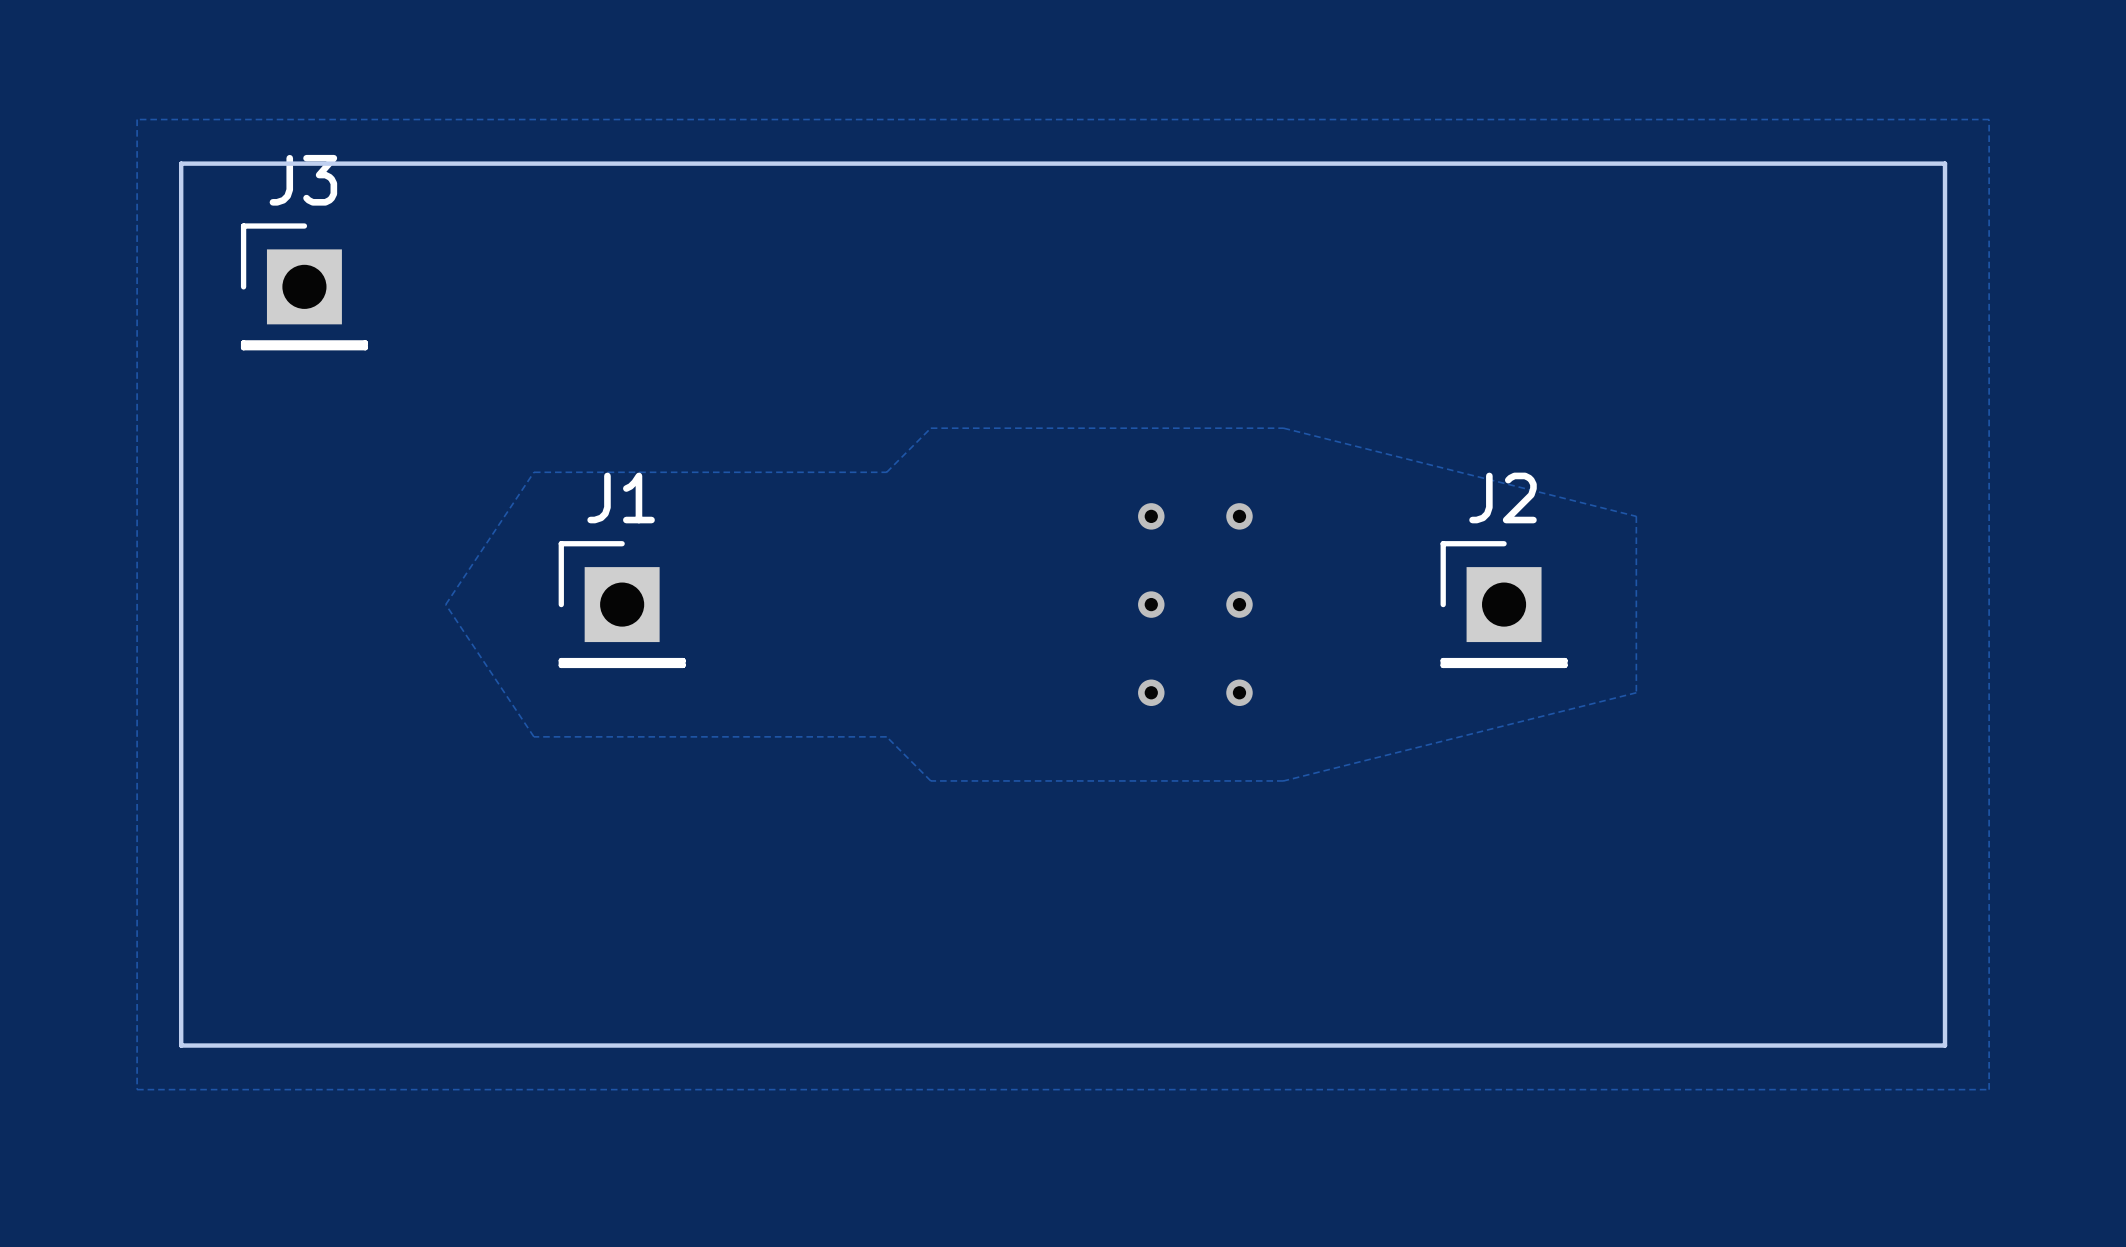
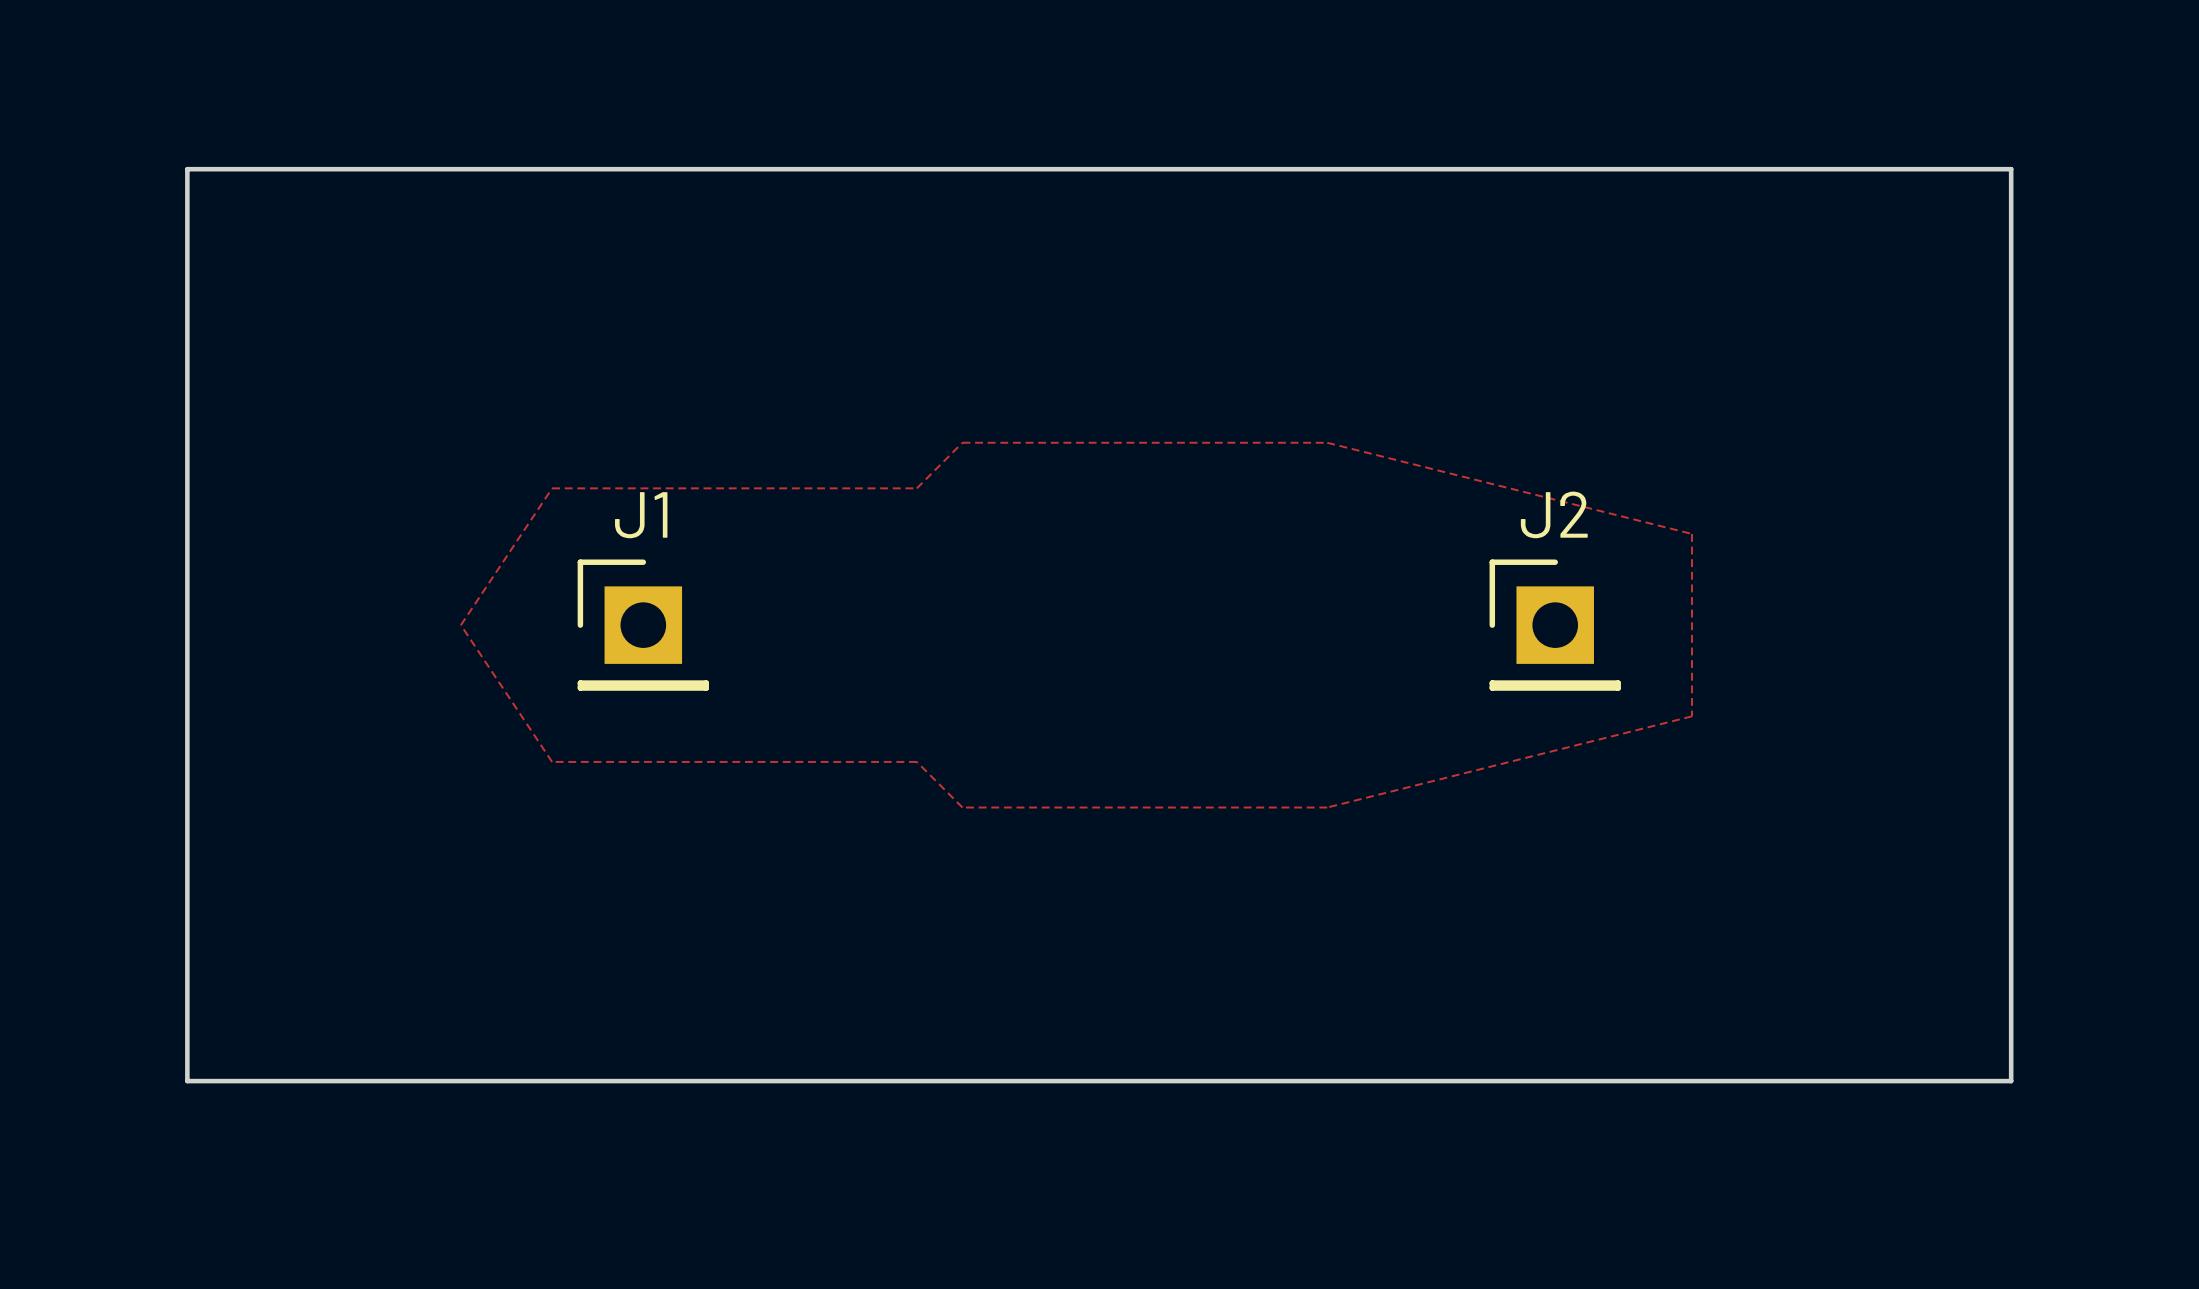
zone outline: (137, 119) (137, 1089) (1989, 1089) (1989, 119) (137, 119) -> none
J3: (304, 286) -> none
via: (1151, 516) -> none
via: (1239, 516) -> none
via: (1151, 604) -> none
via: (1239, 604) -> none
via: (1151, 692) -> none
via: (1239, 692) -> none

